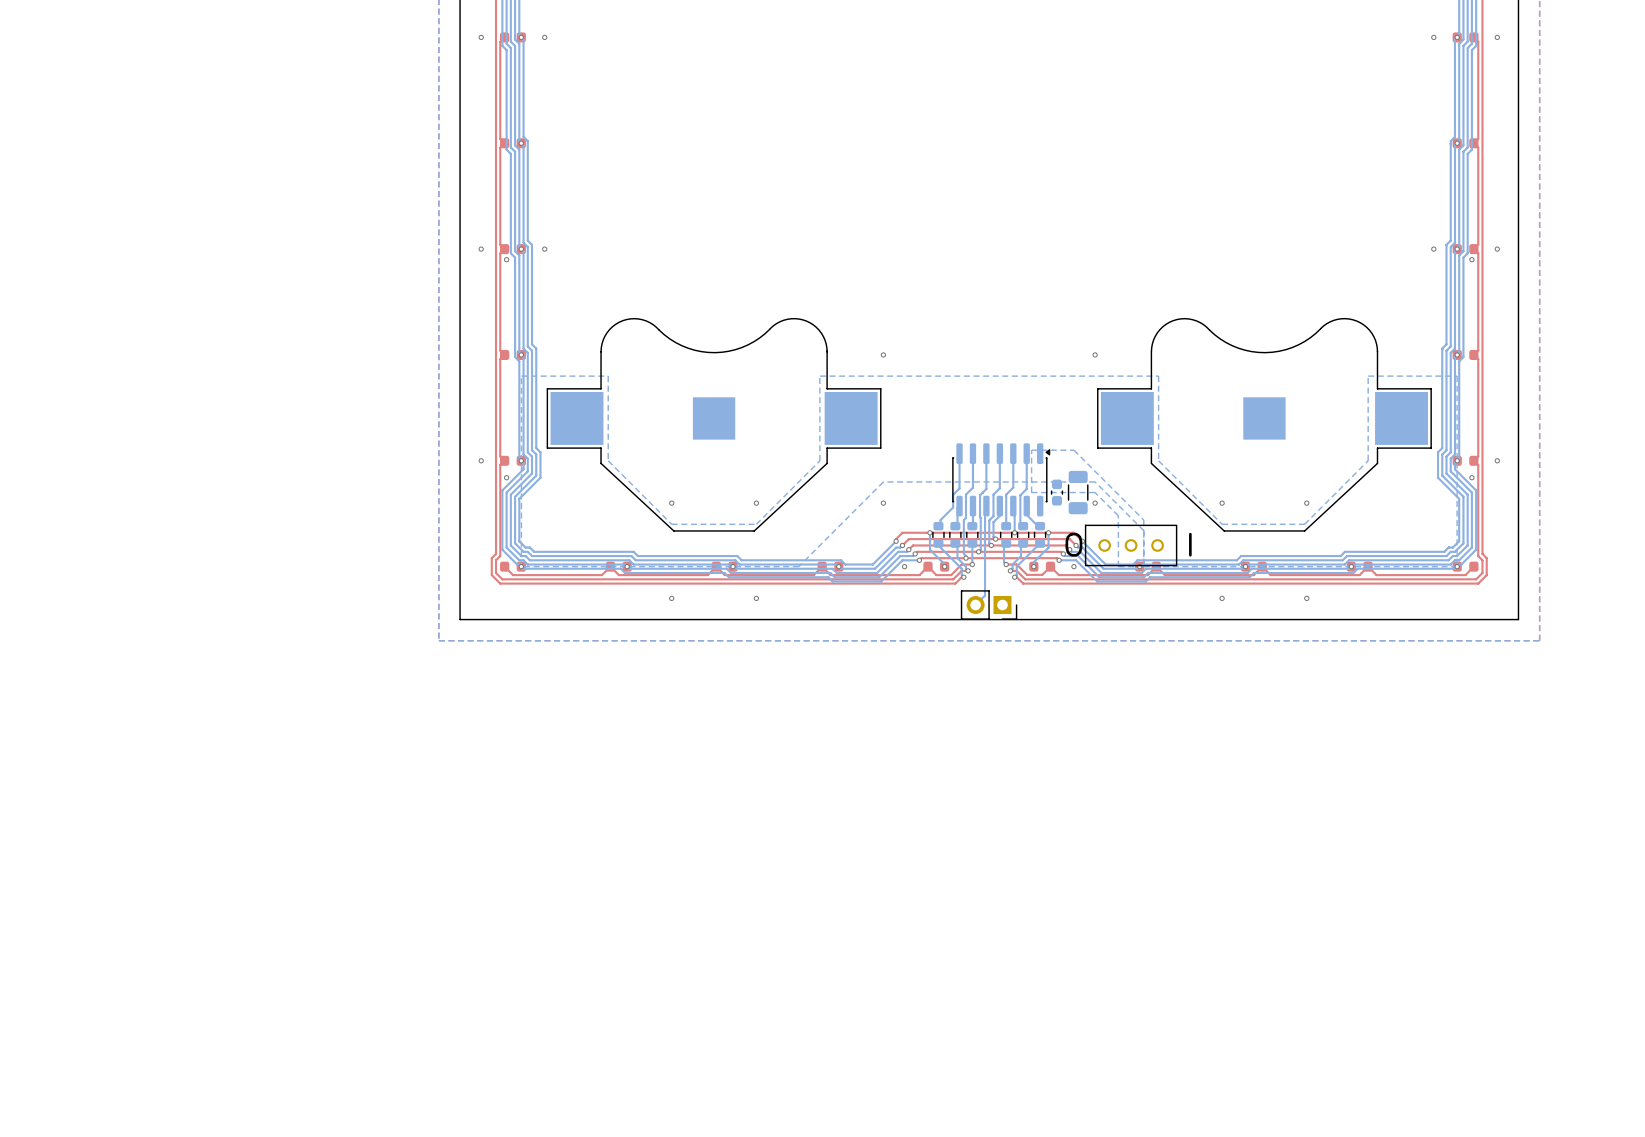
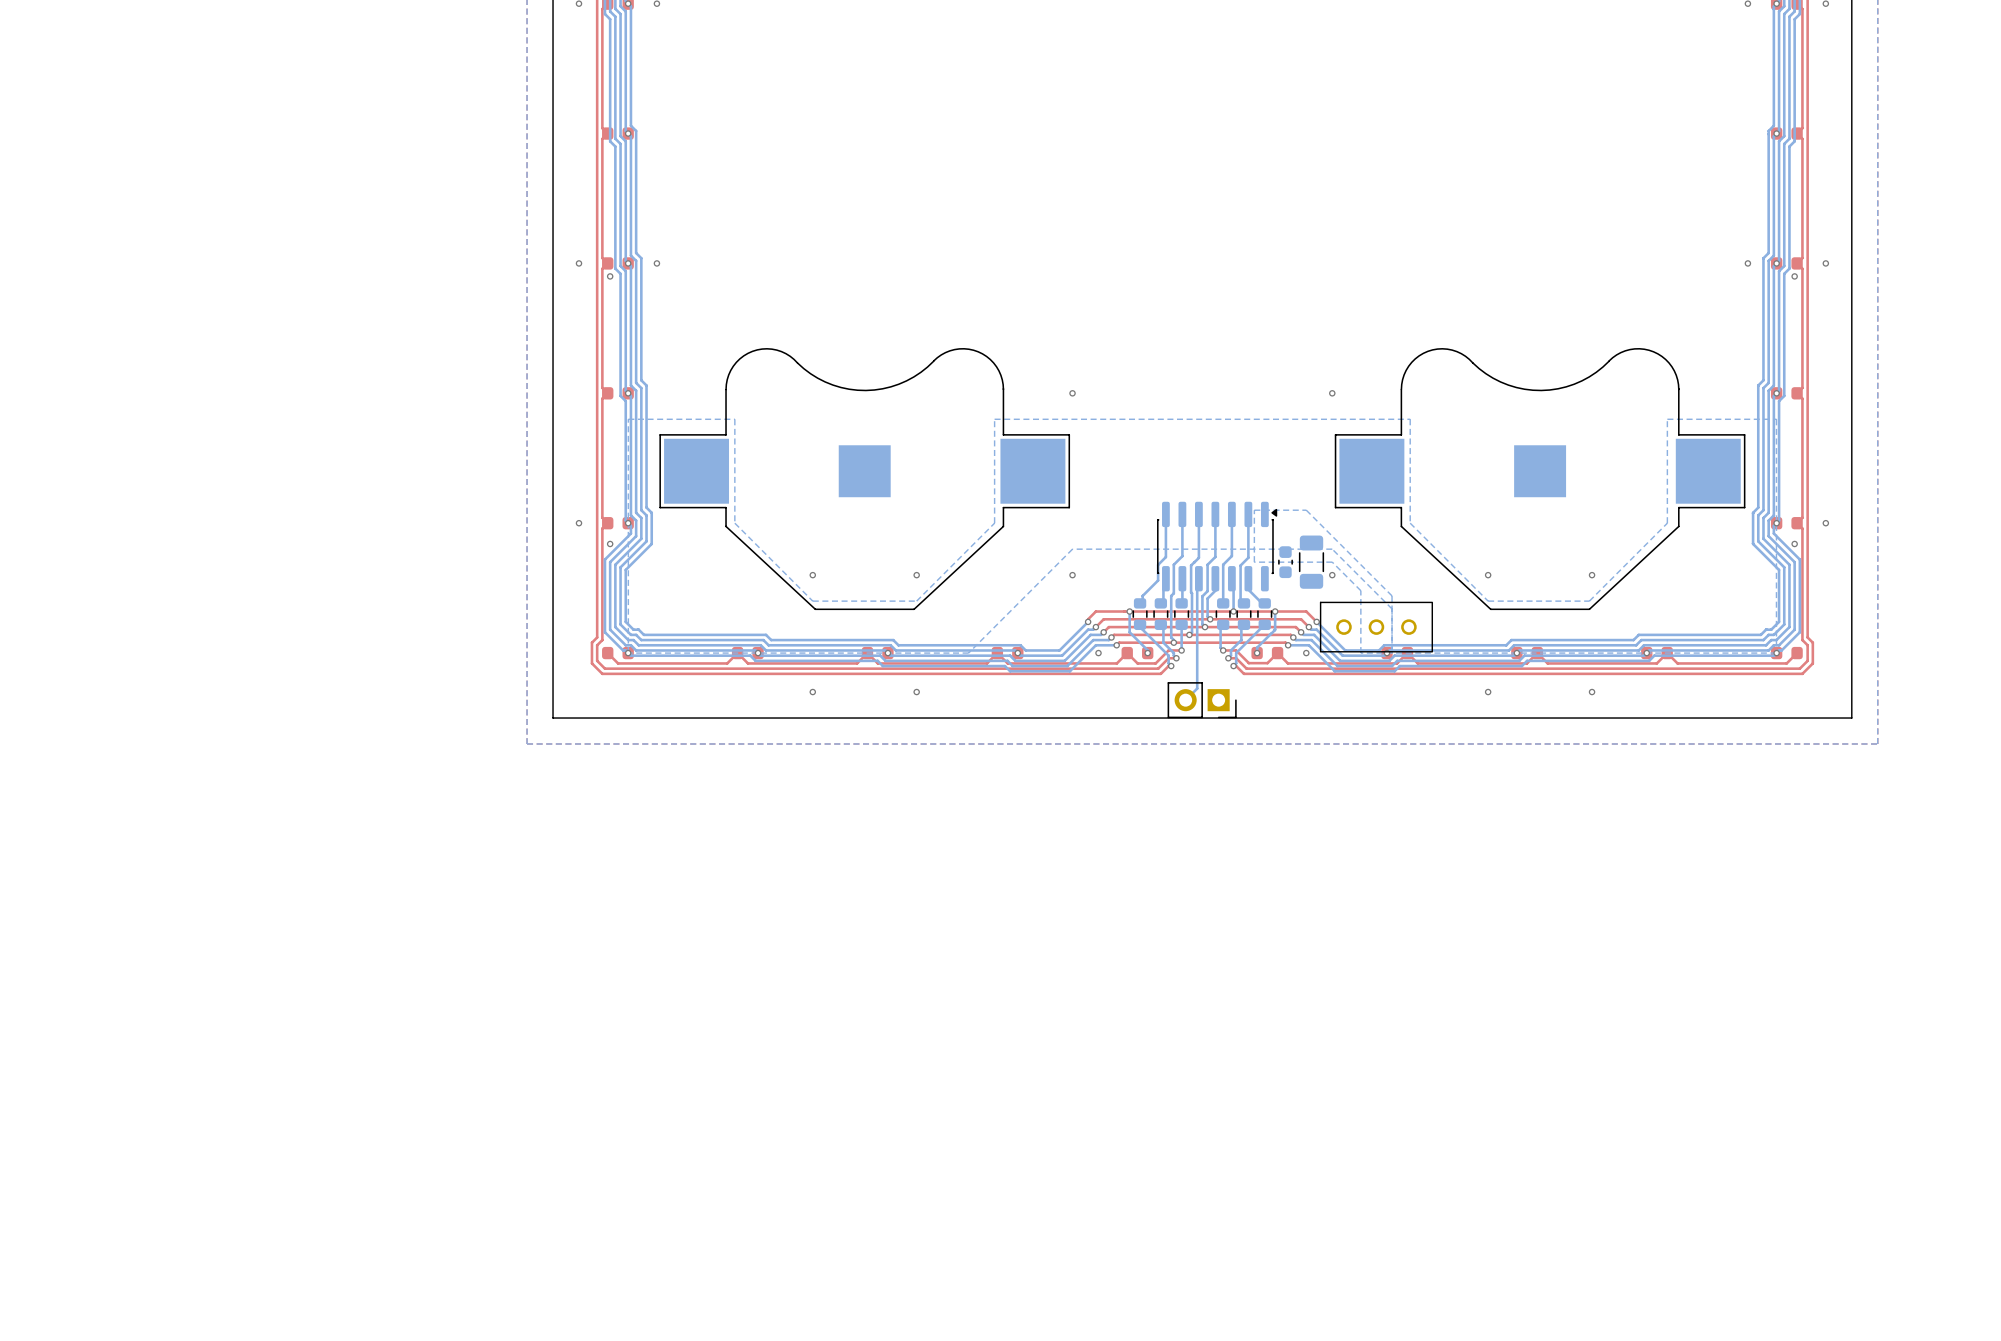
text: O (1073, 544) -> none
text: I (1190, 544) -> none

